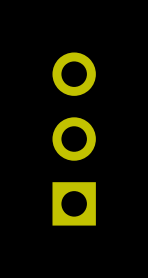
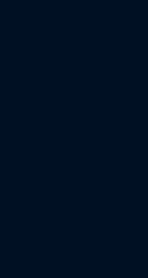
part: (74, 139) -> none

